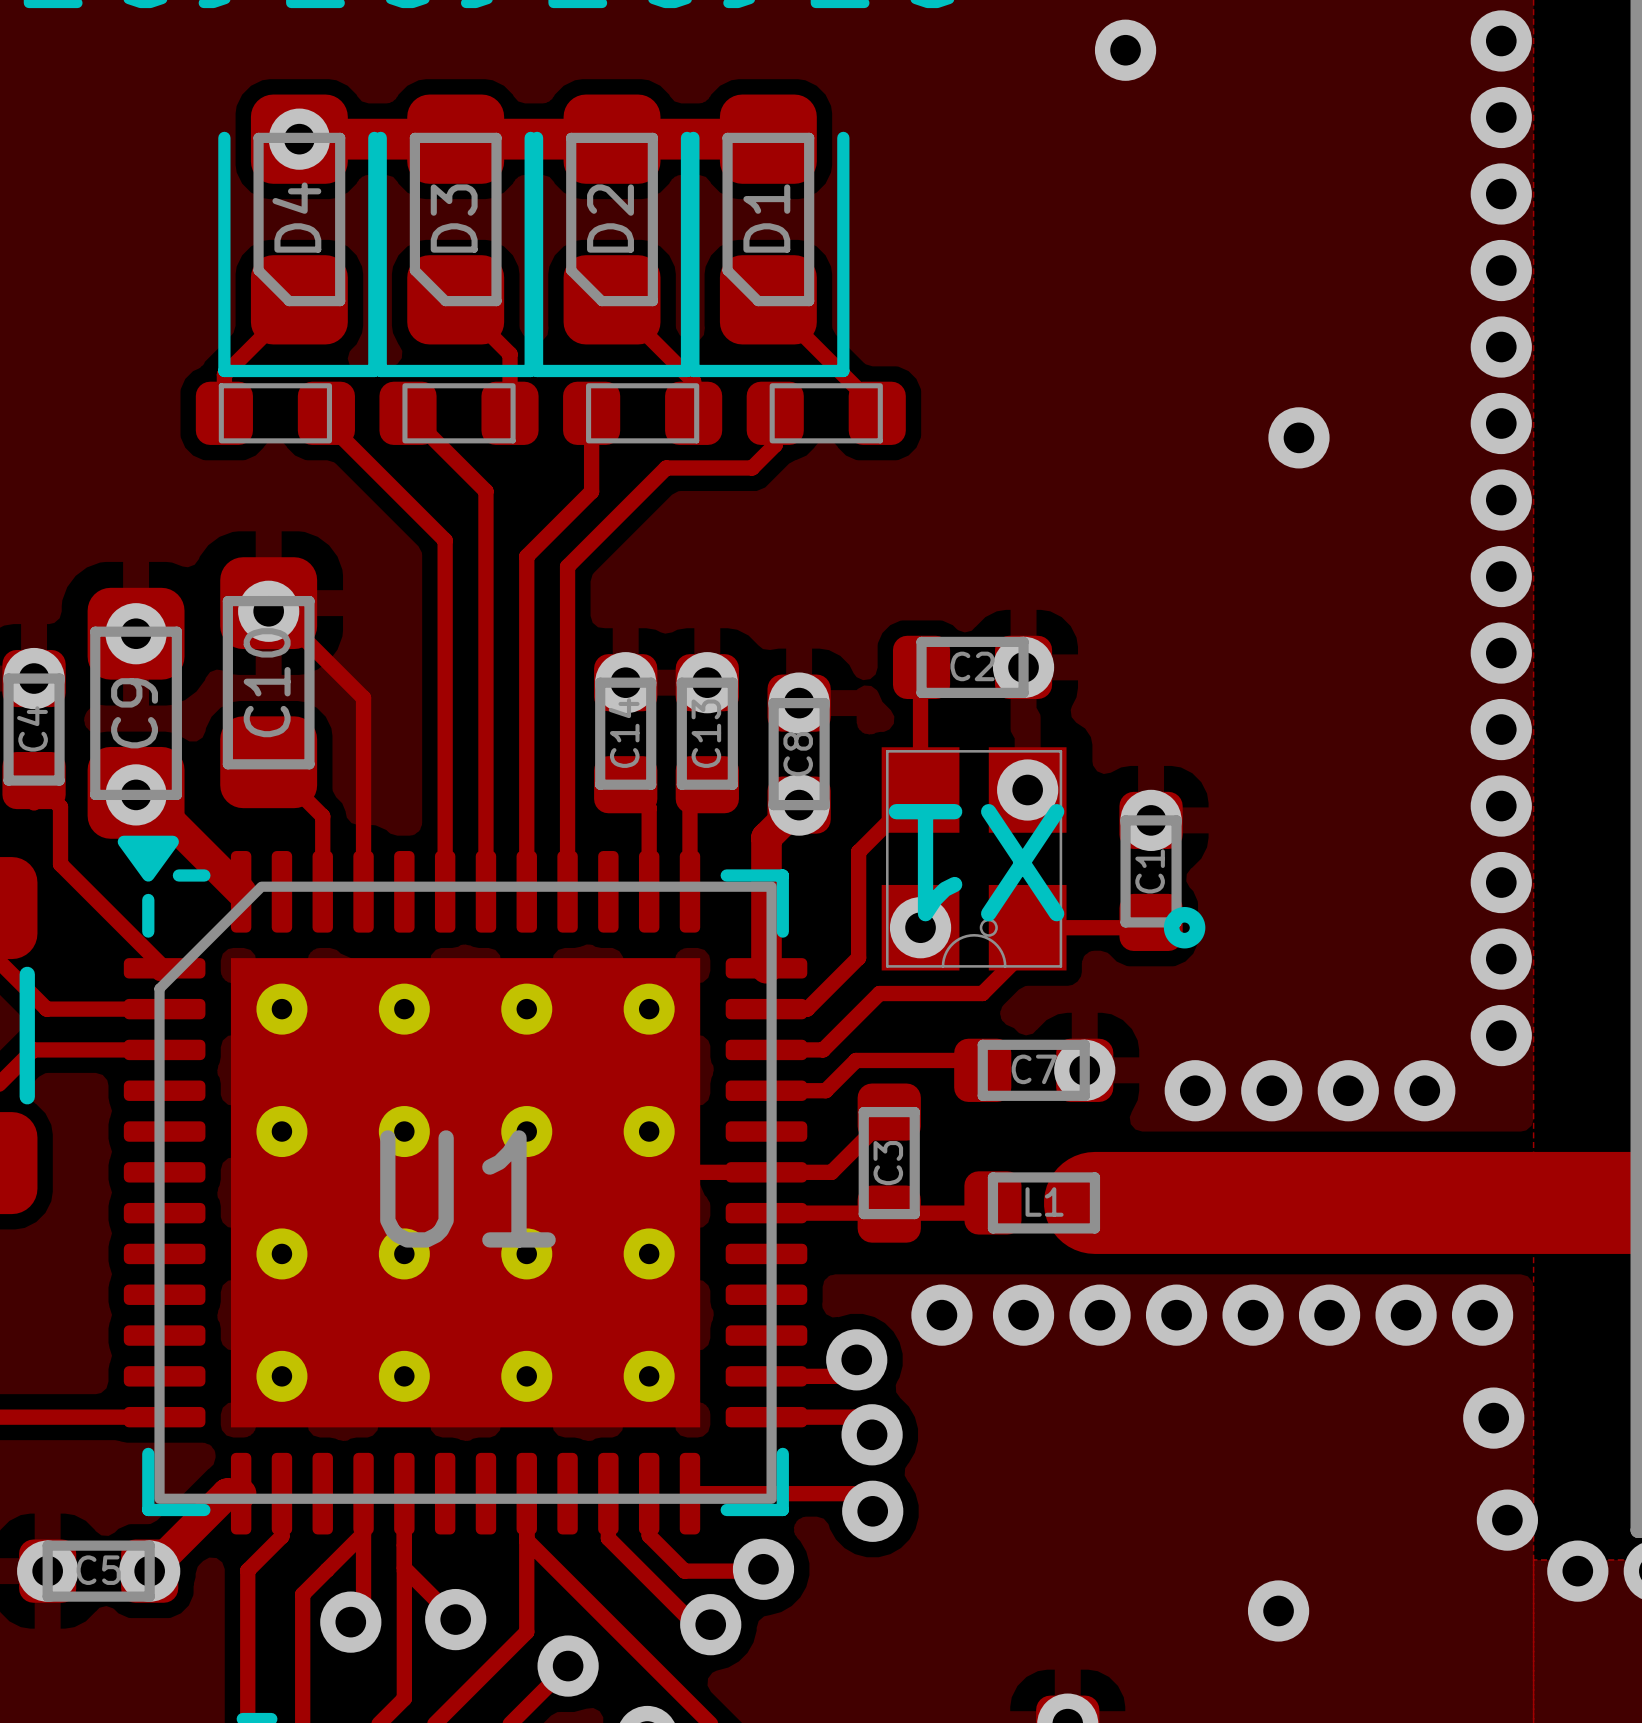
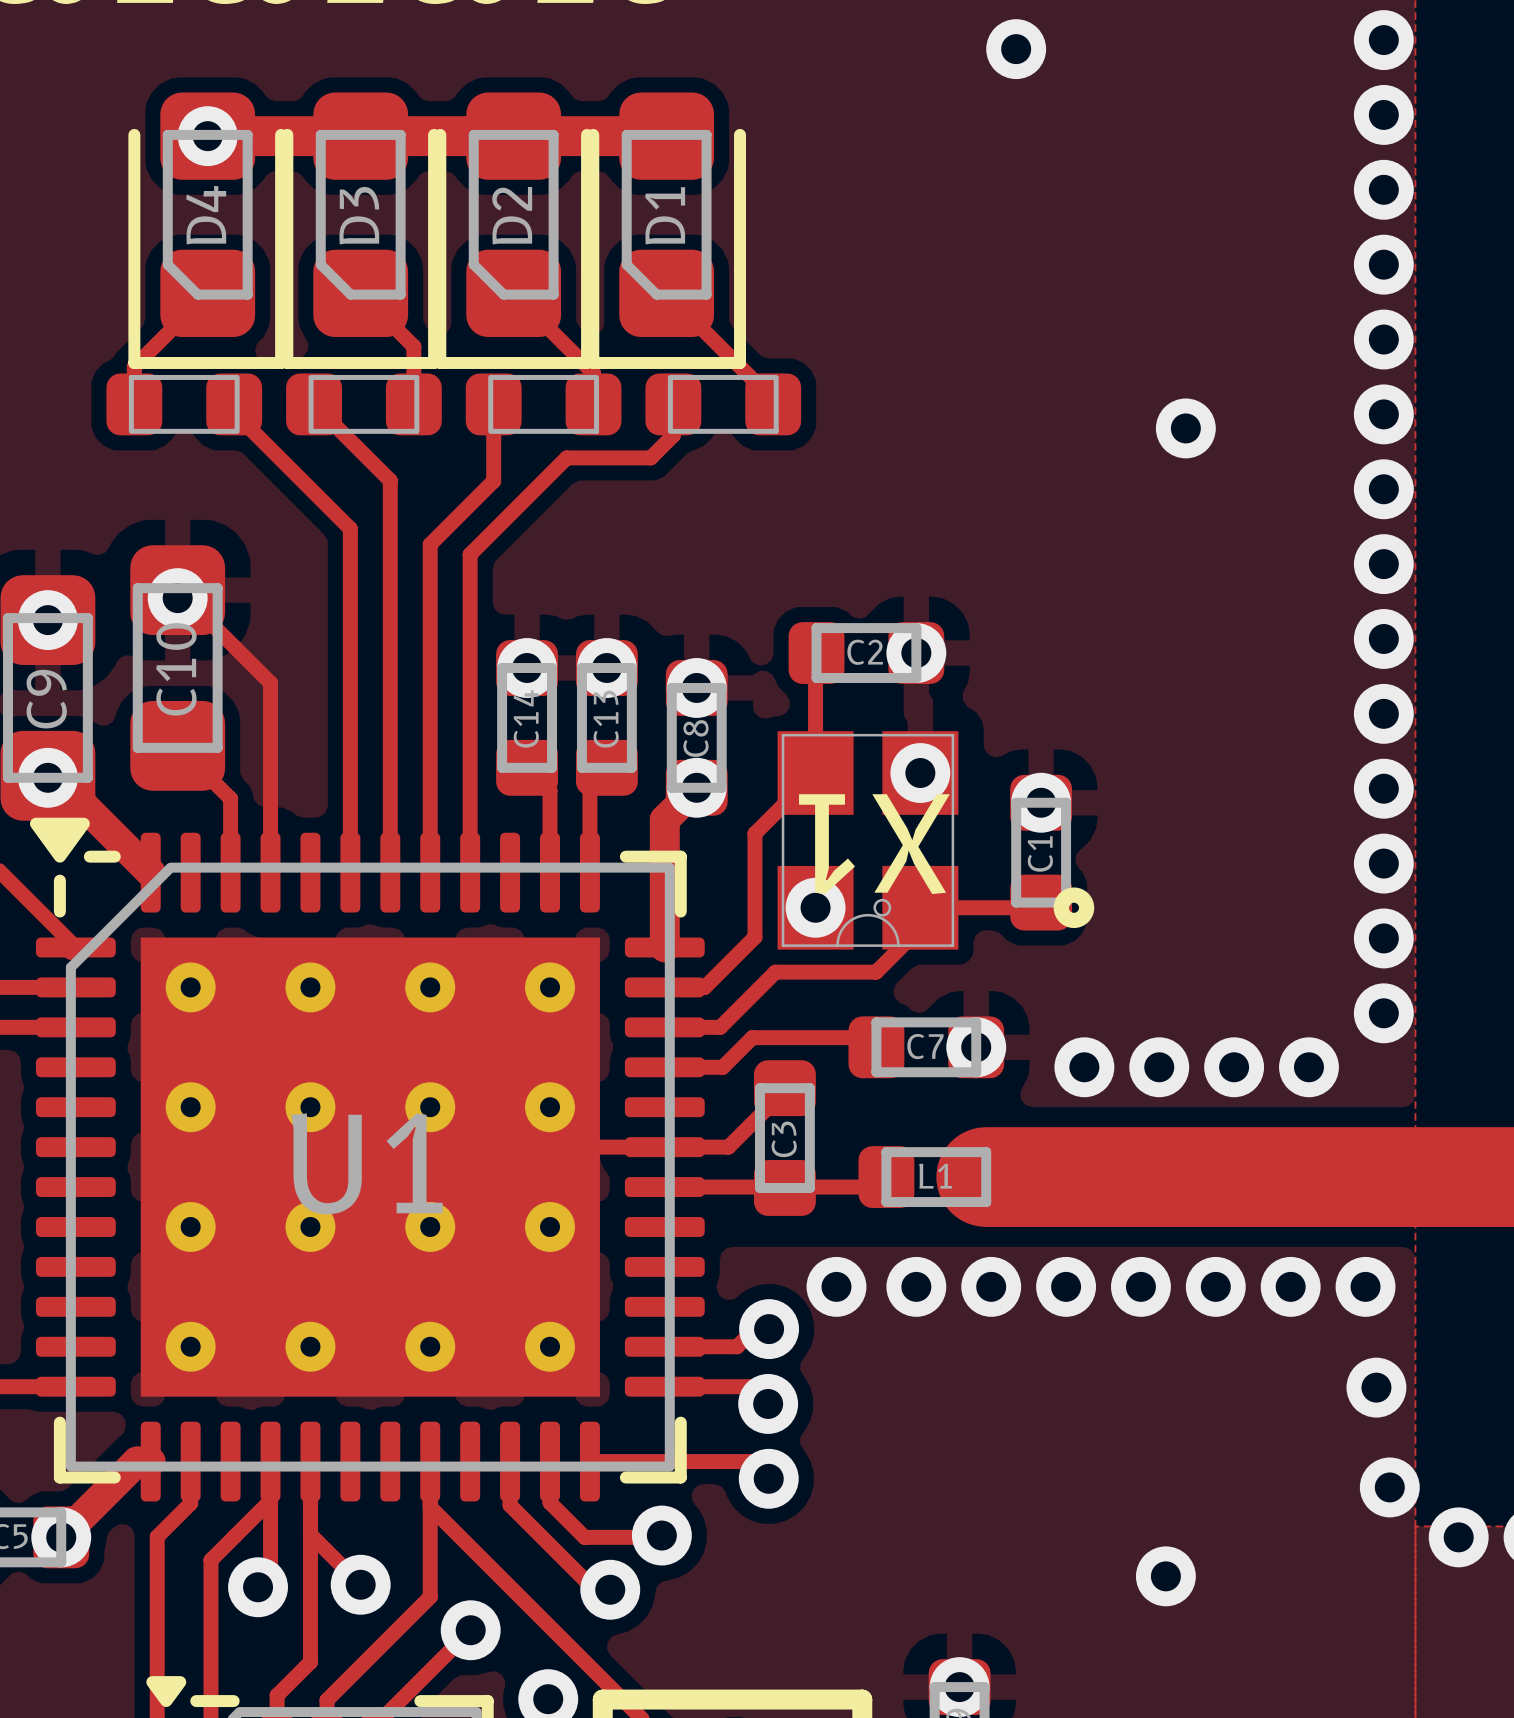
via position: (856, 1359) -> (769, 1329)

